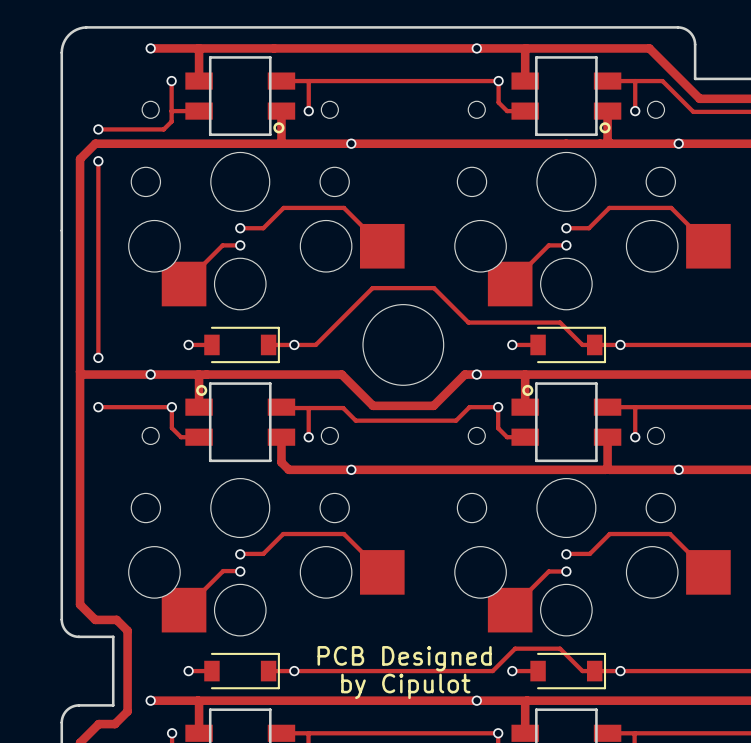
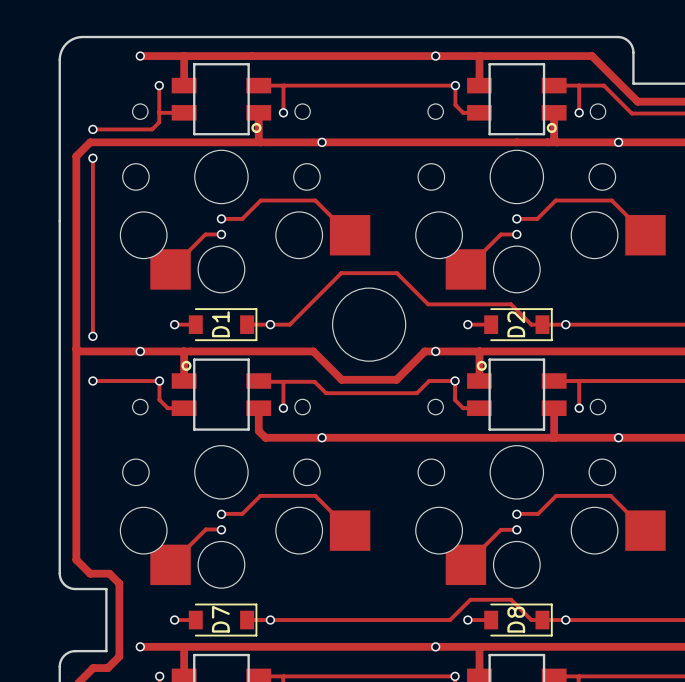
D1 name: none -> D1 (220, 324)
D2 name: none -> D2 (516, 324)
text: PCB Designed (404, 658) -> none
D7 name: none -> D7 (220, 619)
D8 name: none -> D8 (516, 619)
text: by Cipulot (405, 686) -> none

